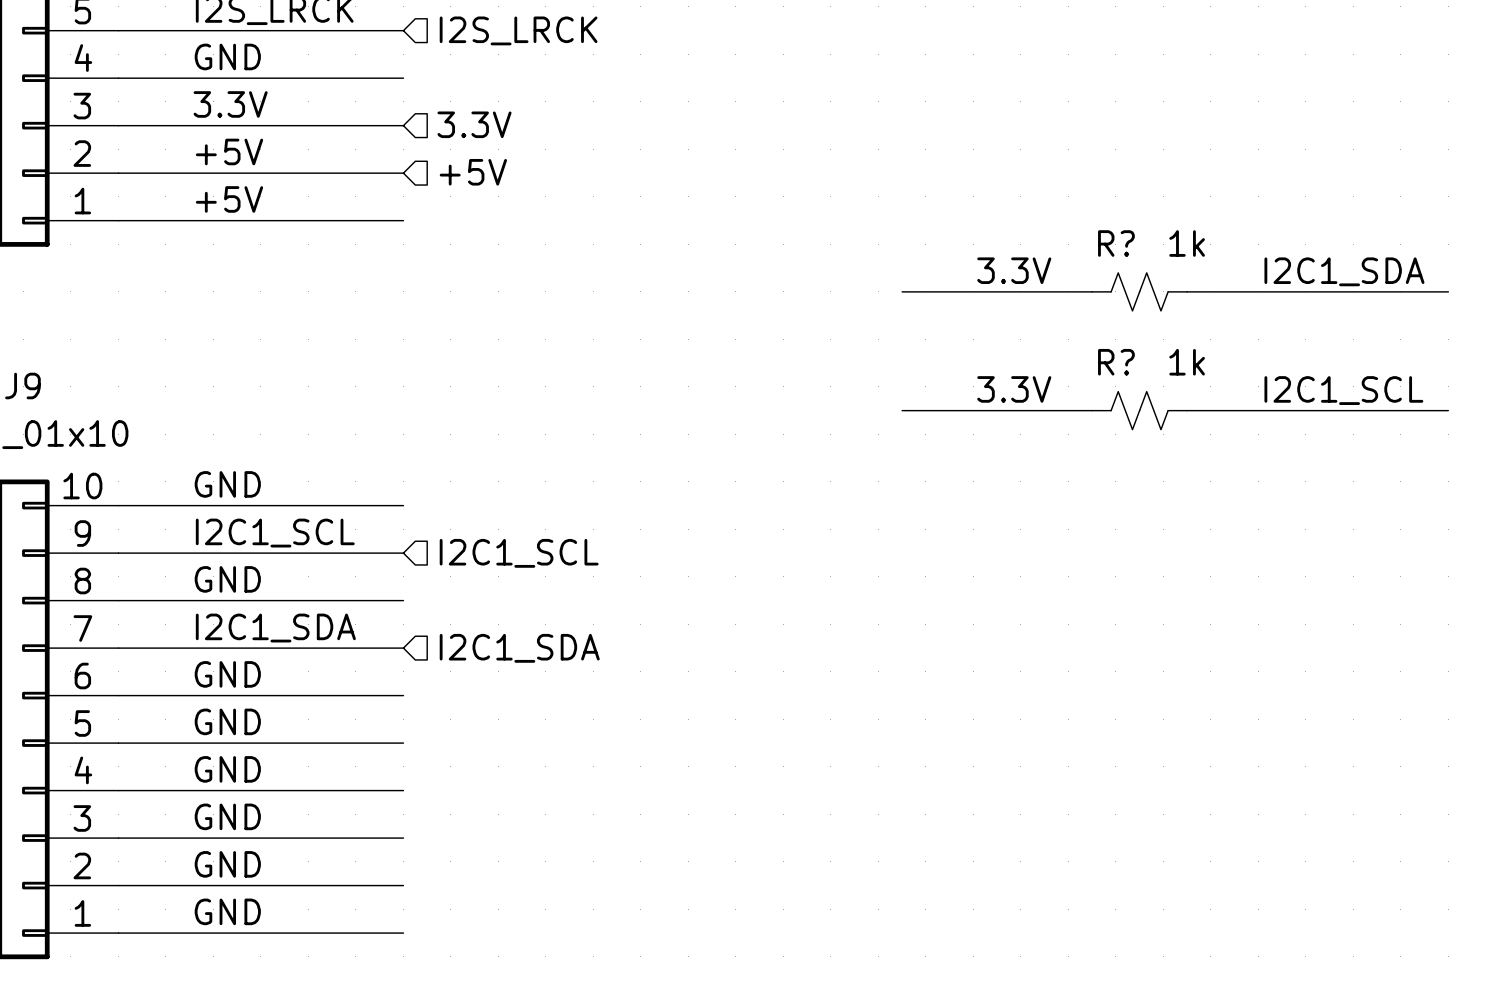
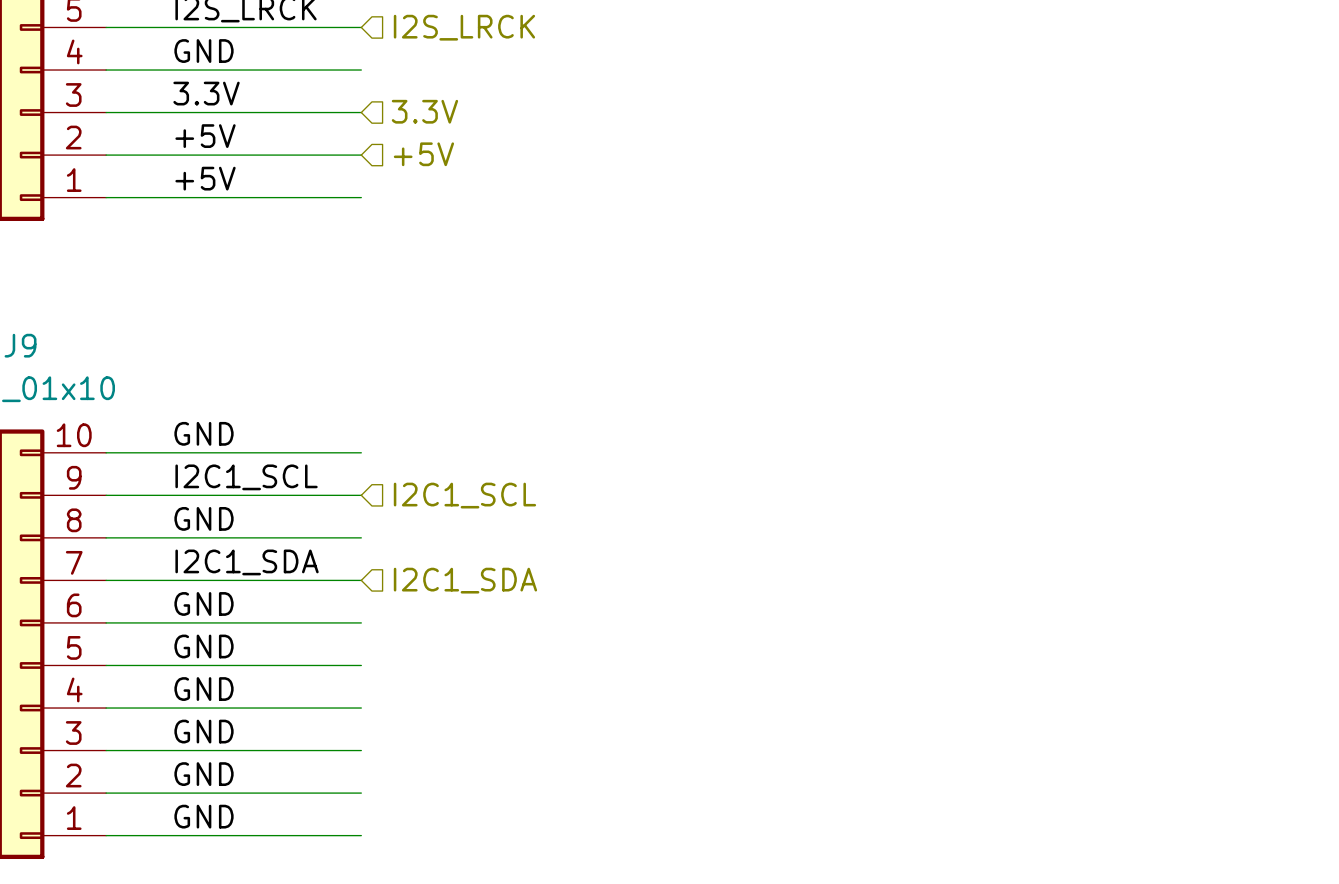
label: 3.3V (1014, 270) -> none
label: I2C1_SDA (1344, 271) -> none
wire: (902, 291) (1092, 291) -> none
R?: 1k (1139, 291) -> none
wire: (1187, 291) (1448, 291) -> none
label: 3.3V (1014, 389) -> none
label: I2C1_SCL (1343, 390) -> none
wire: (902, 410) (1092, 410) -> none
R?: 1k (1139, 410) -> none
wire: (1187, 410) (1448, 410) -> none

